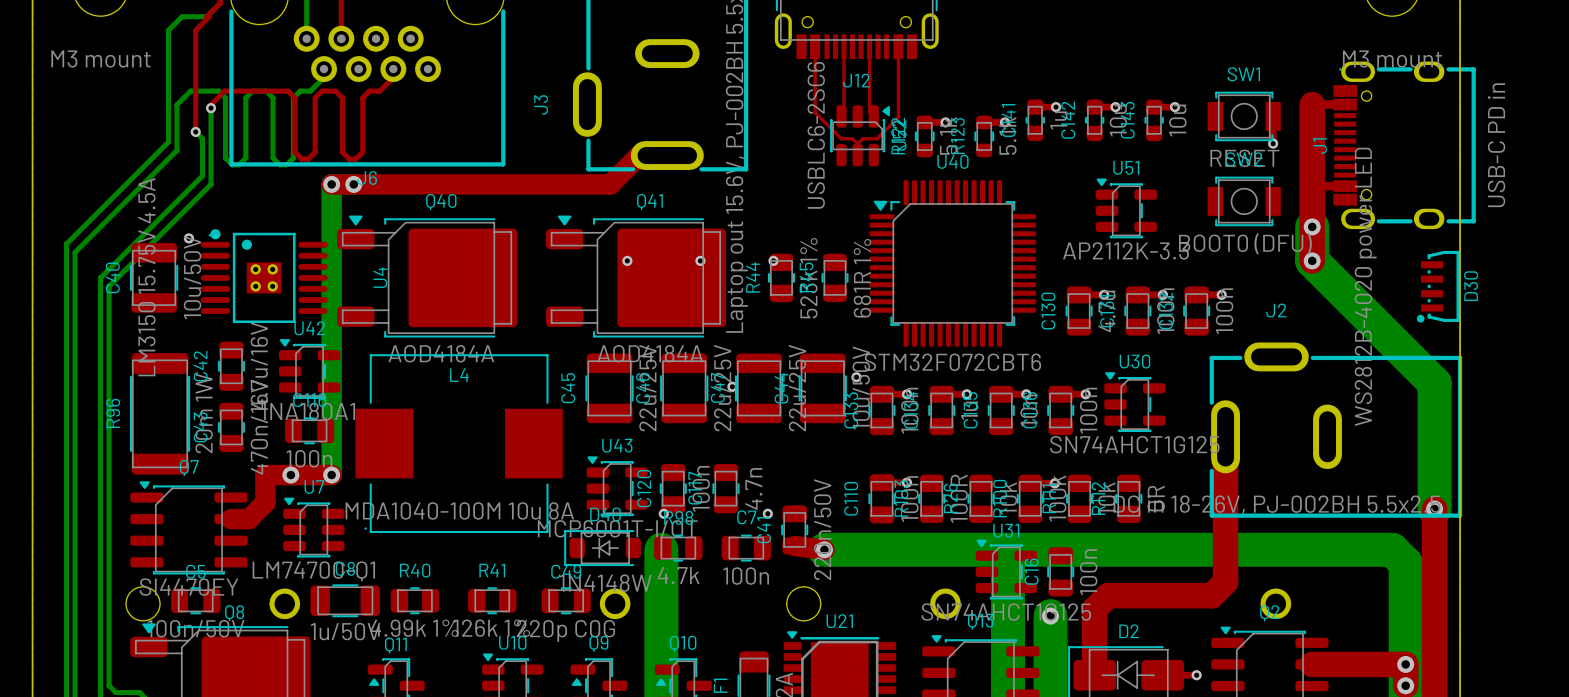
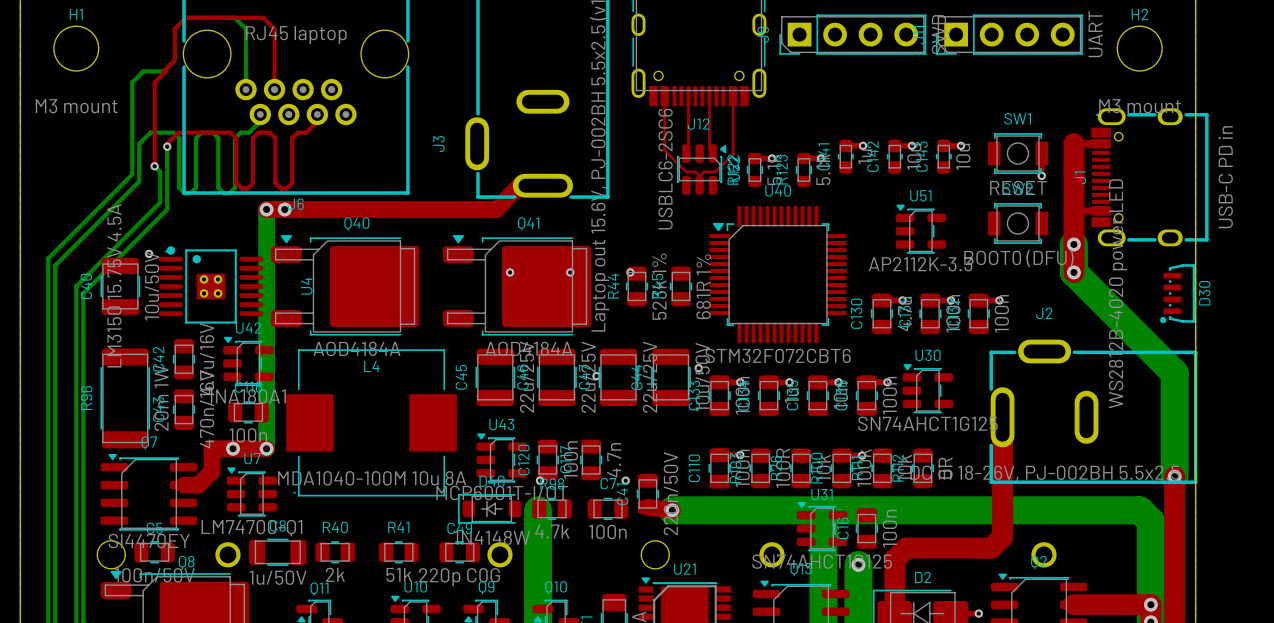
R40 value: 4.99k 1% (414, 628) -> 2k (335, 574)
R41 value: 126k 1% (491, 628) -> 51k (399, 574)

